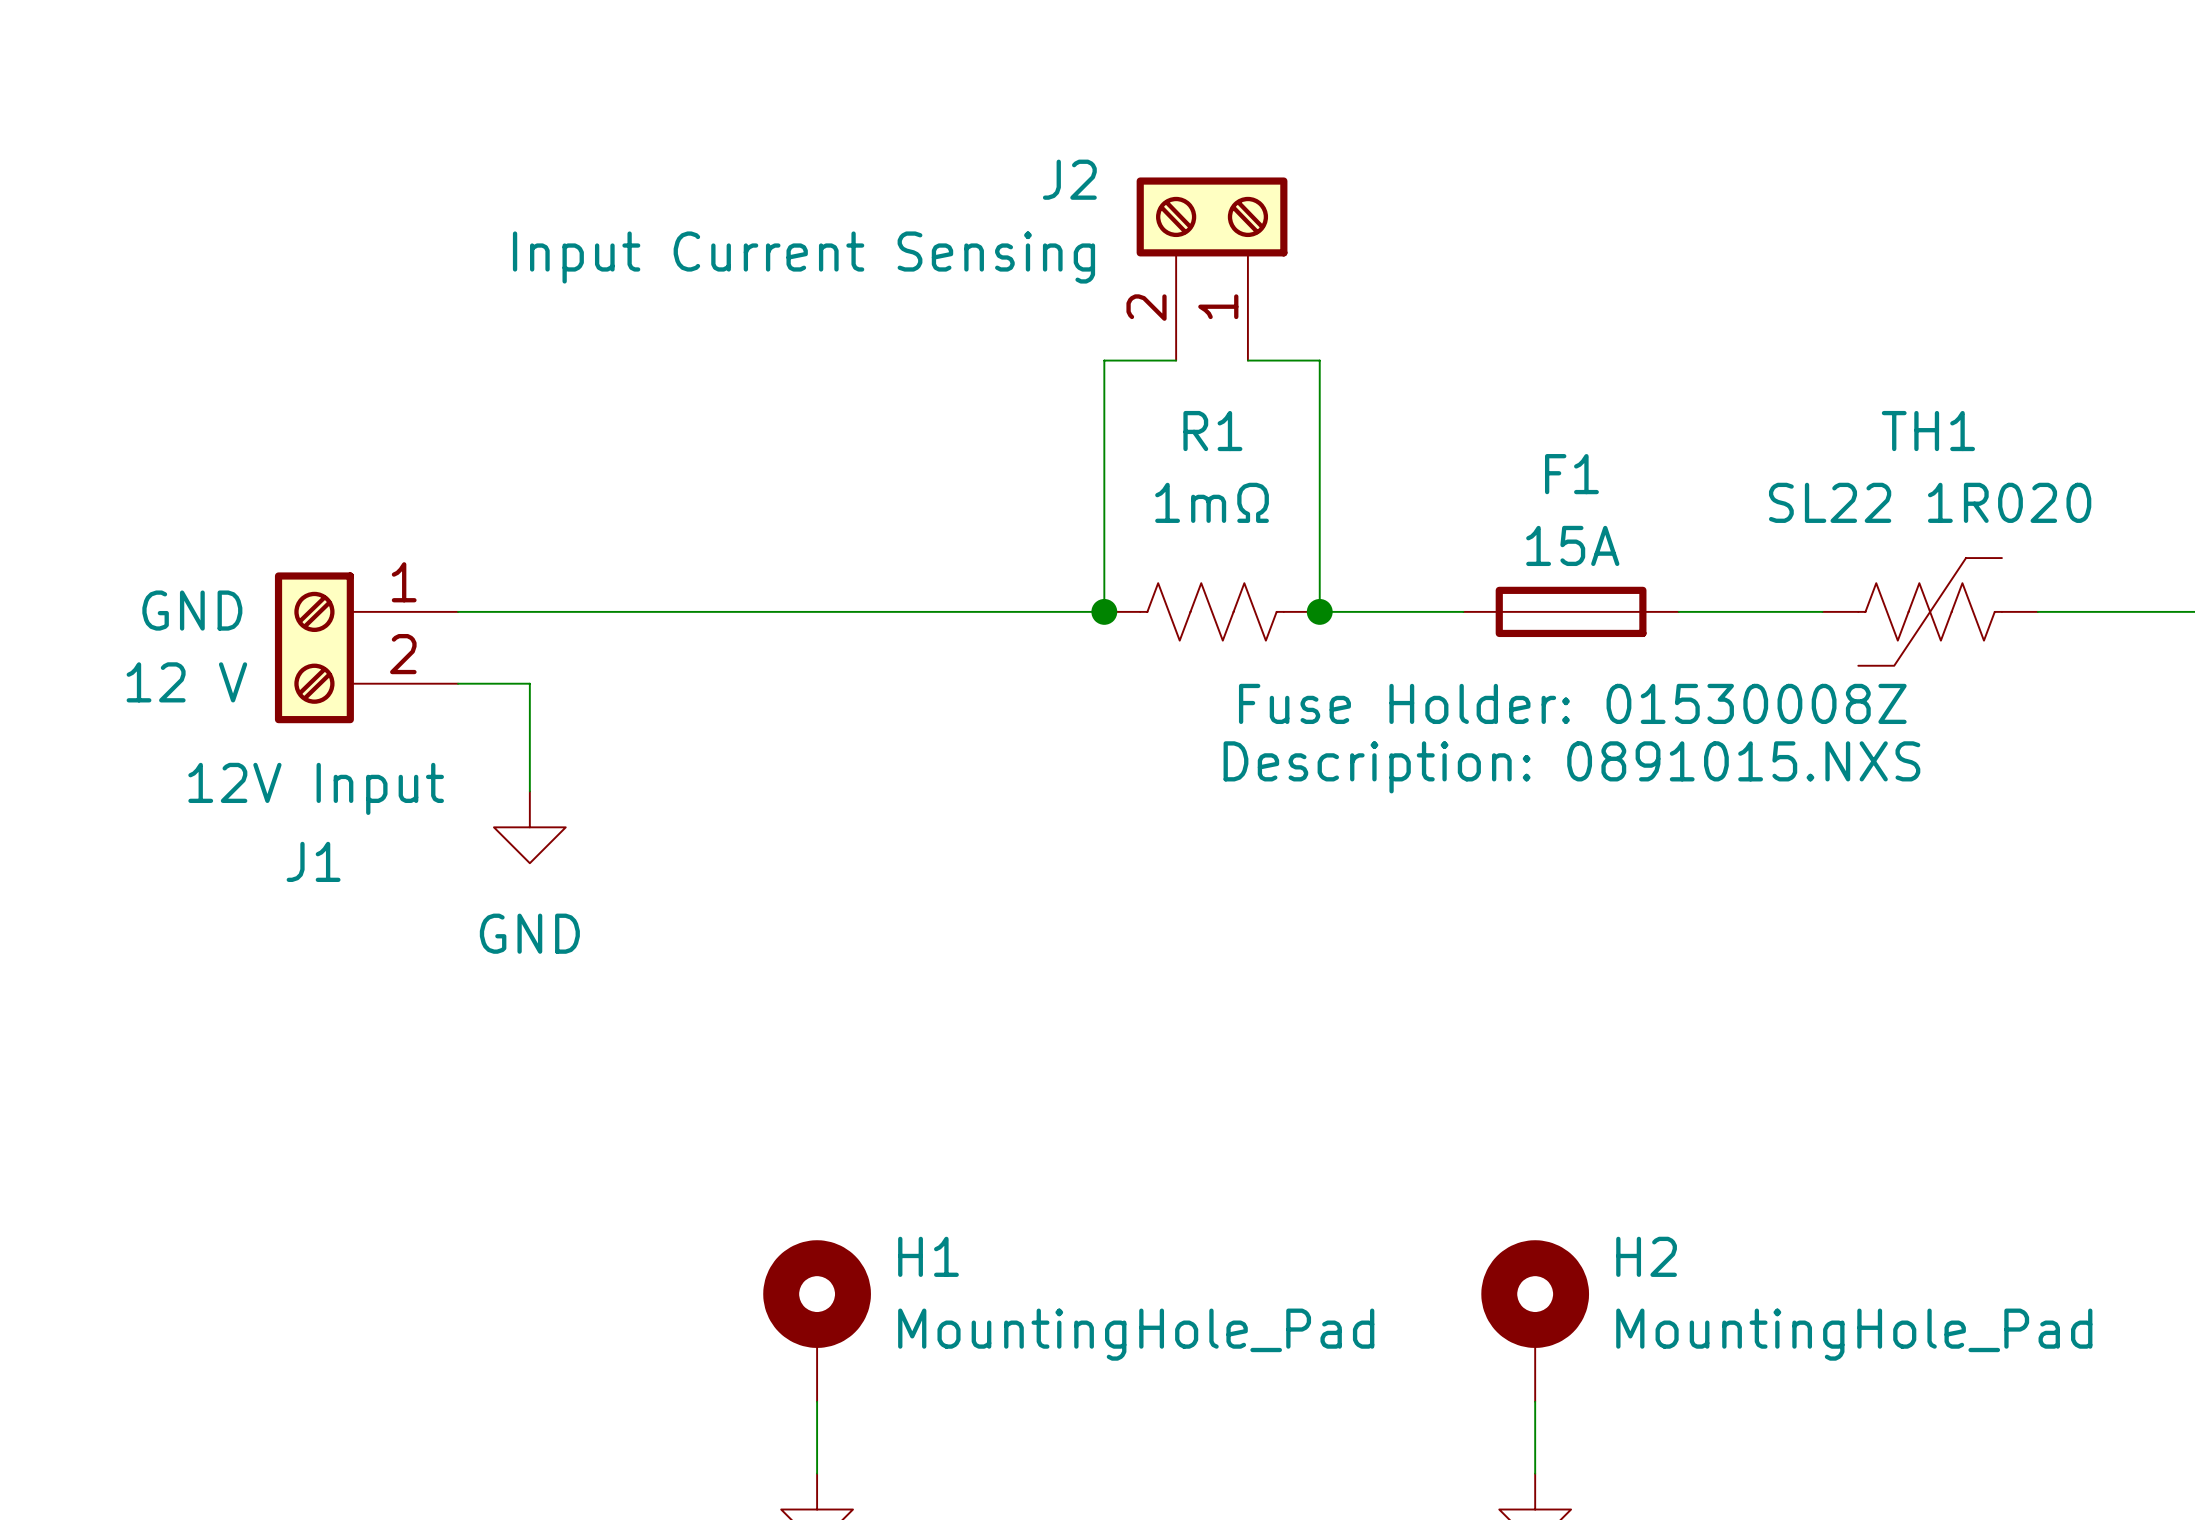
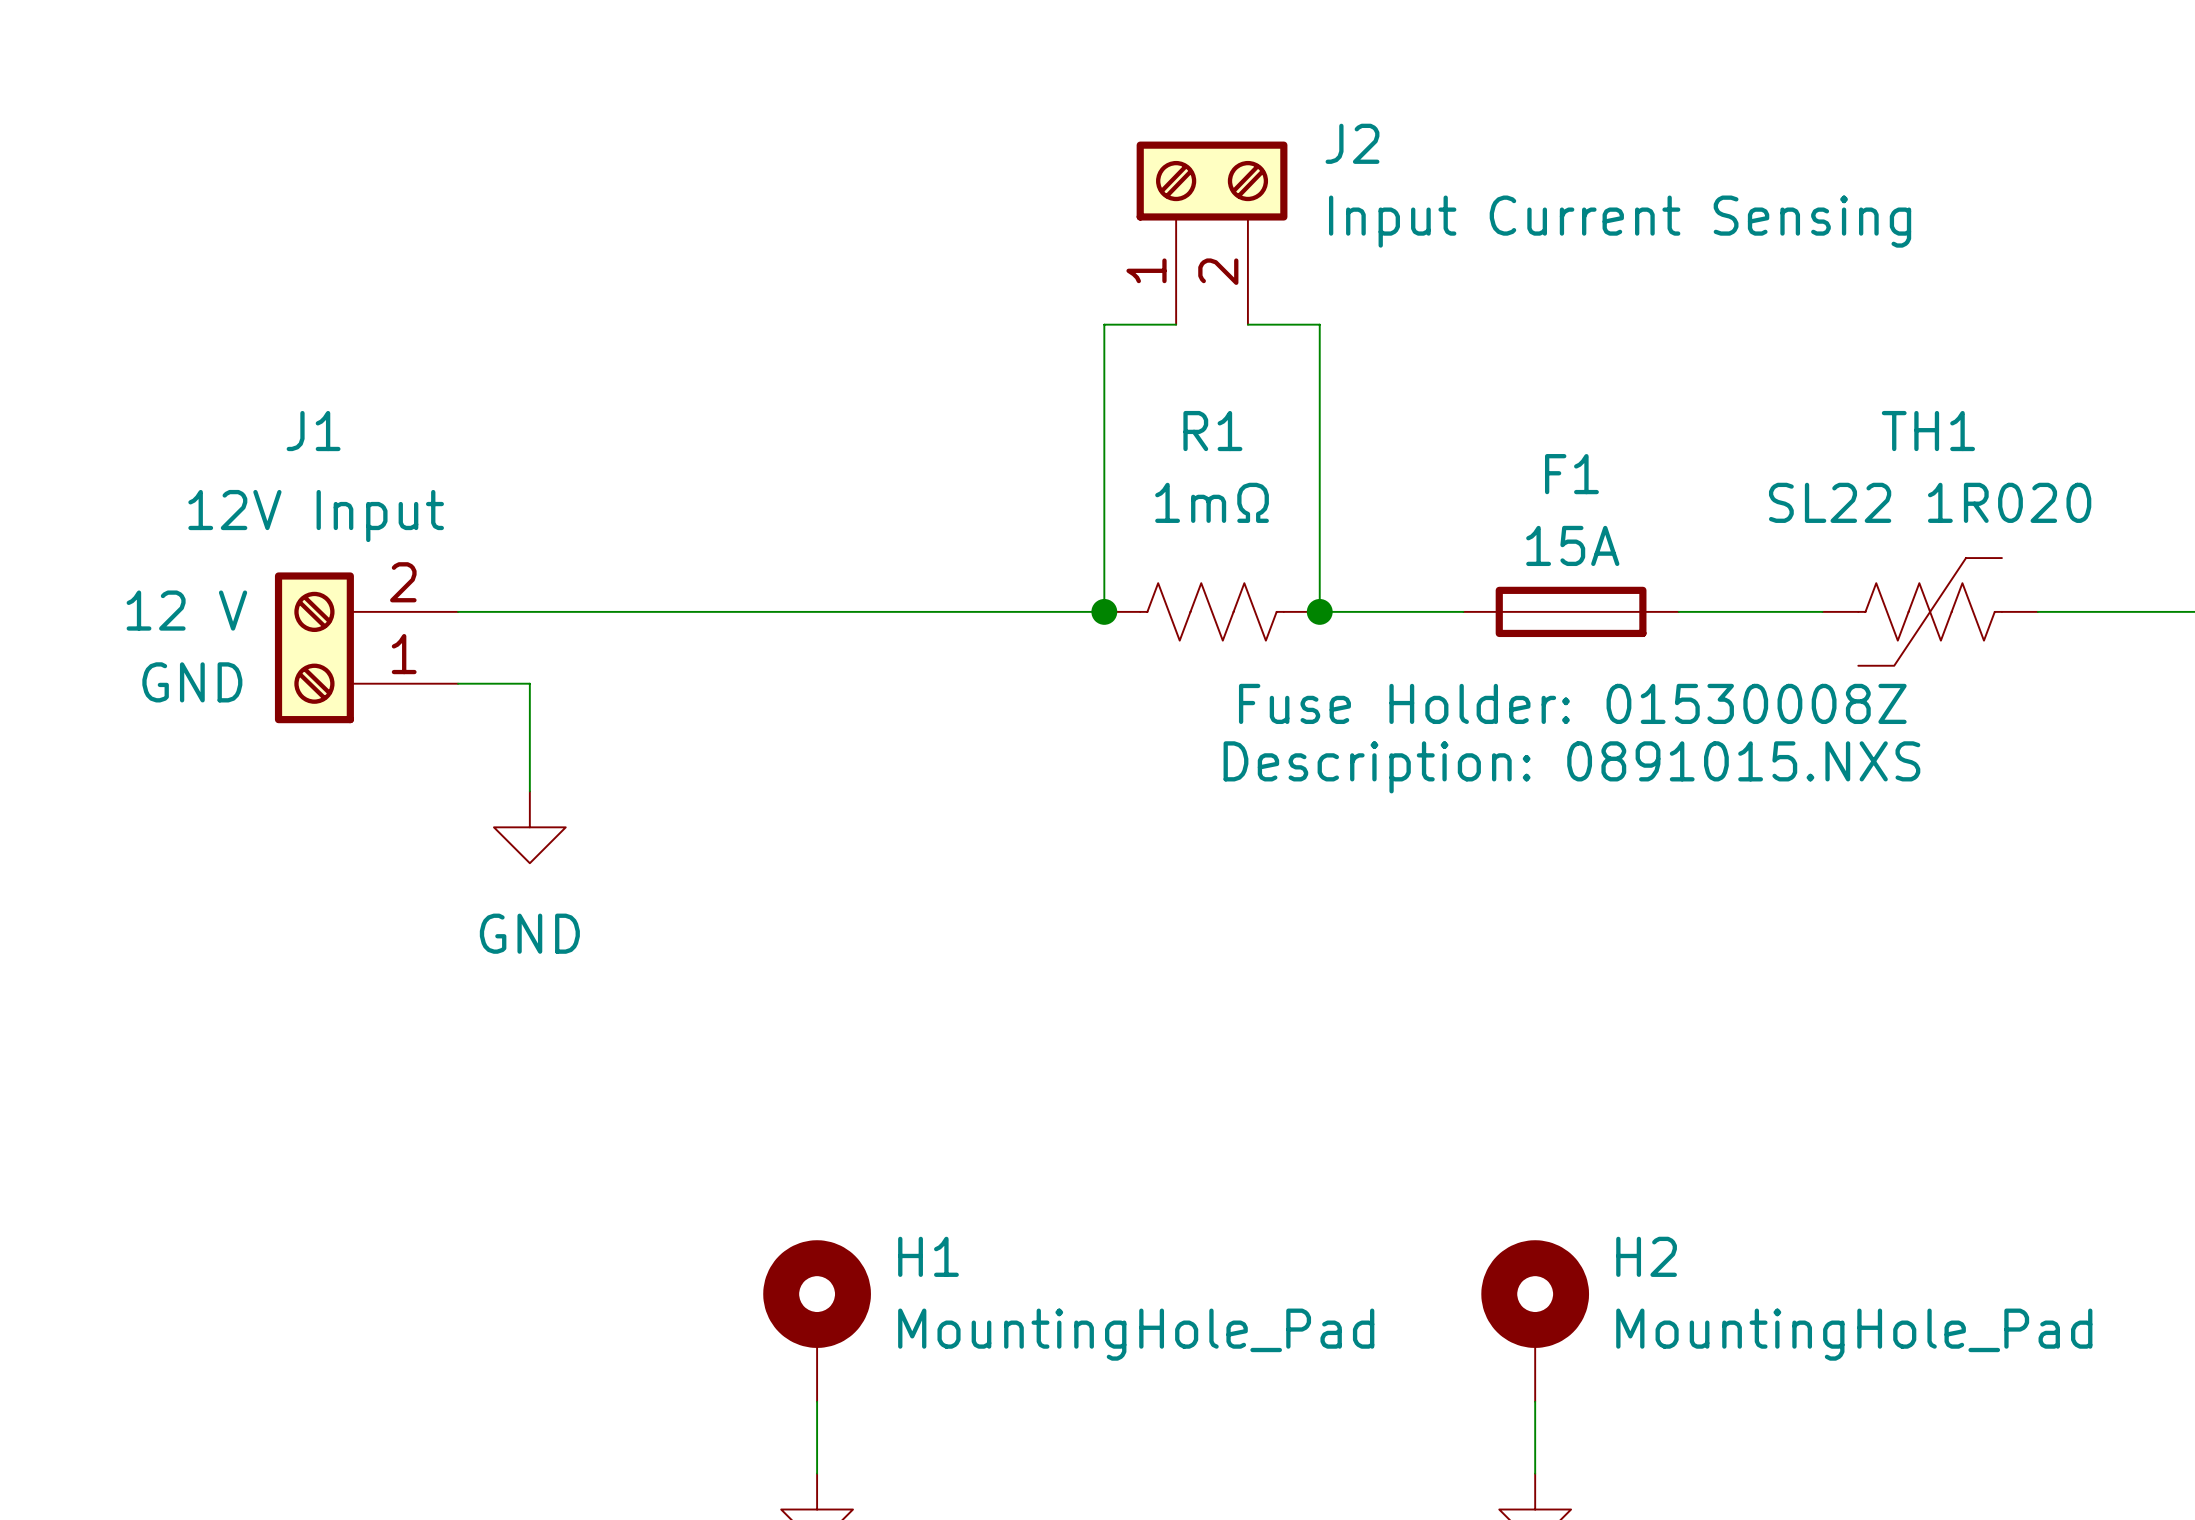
J2 flip: as is (1212, 216) -> left-right (1212, 181)
wire: (1104, 360) (1176, 360) -> (1104, 360) (1104, 324) (1176, 324)
wire: (1247, 360) (1319, 360) -> (1247, 324) (1319, 324) (1319, 360)
J1 flip: as is (314, 647) -> up-down (314, 647)

